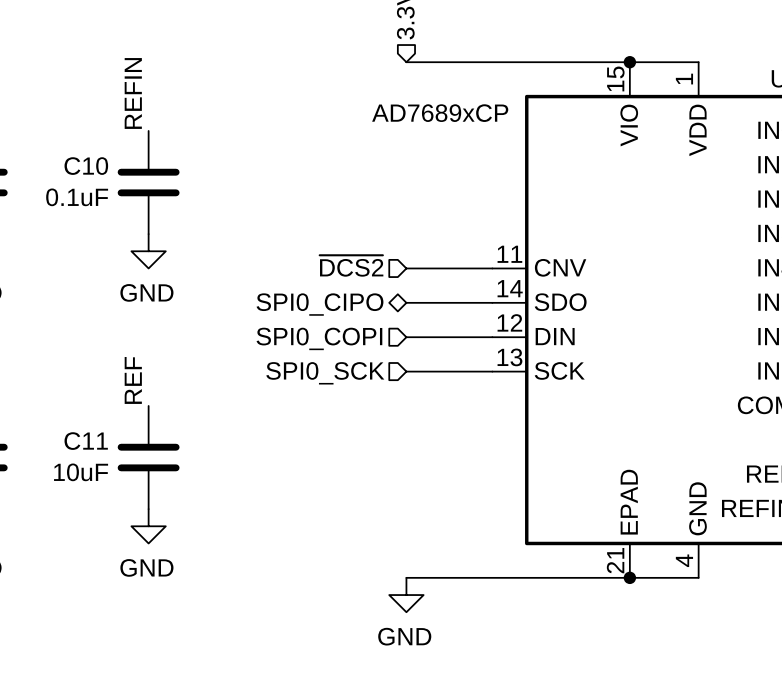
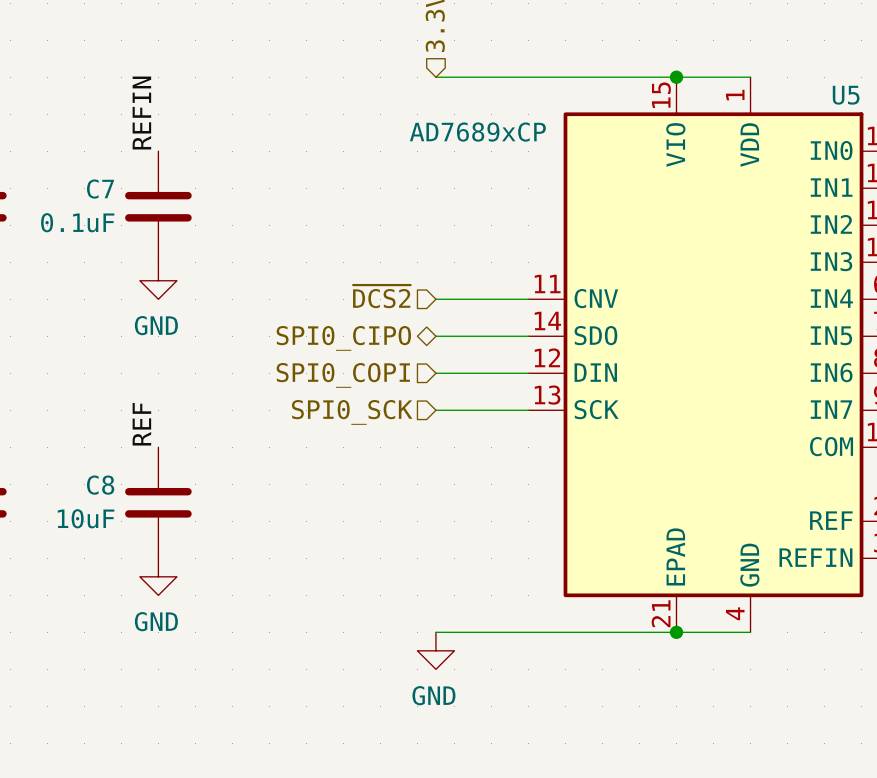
C10 name: C10 (86, 166) -> C7 (100, 189)
C11 name: C11 (86, 441) -> C8 (100, 485)

